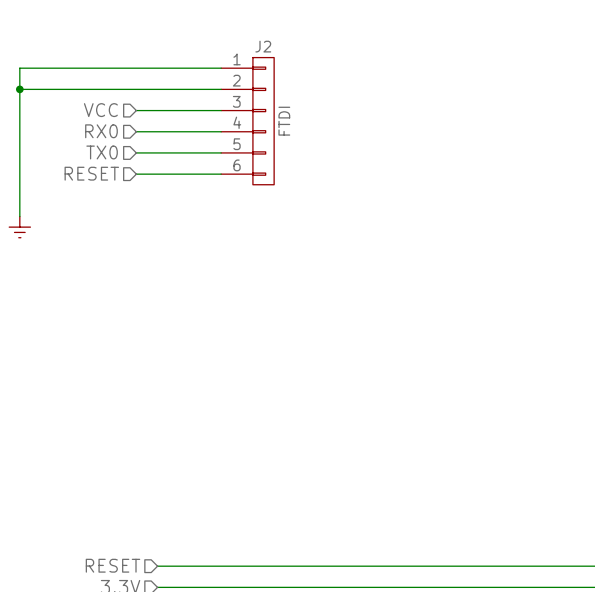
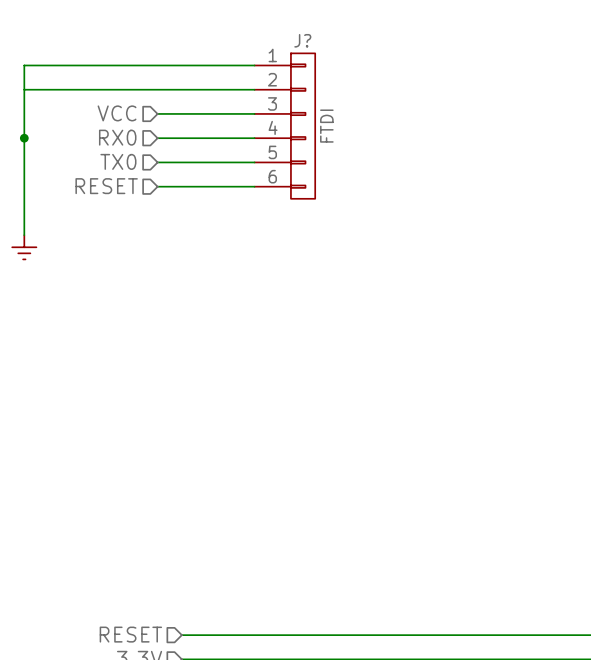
J2 name: J2 (263, 46) -> J? (302, 40)
junction position: (19, 89) -> (24, 138)

